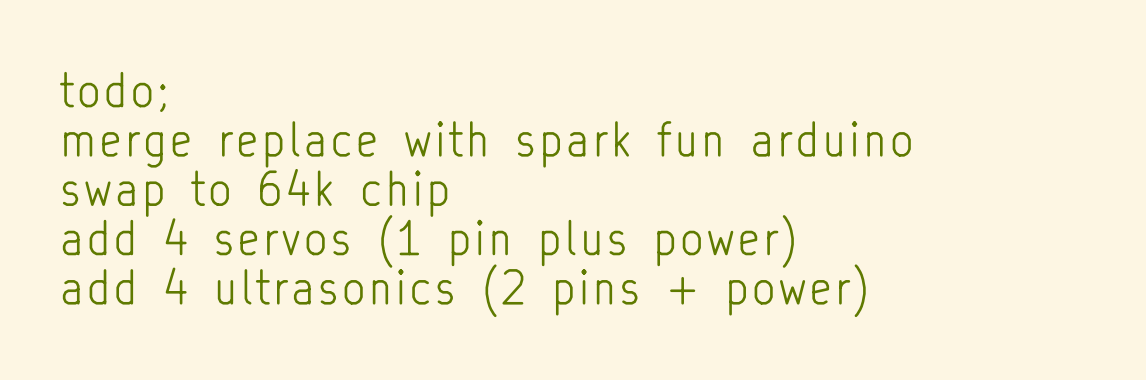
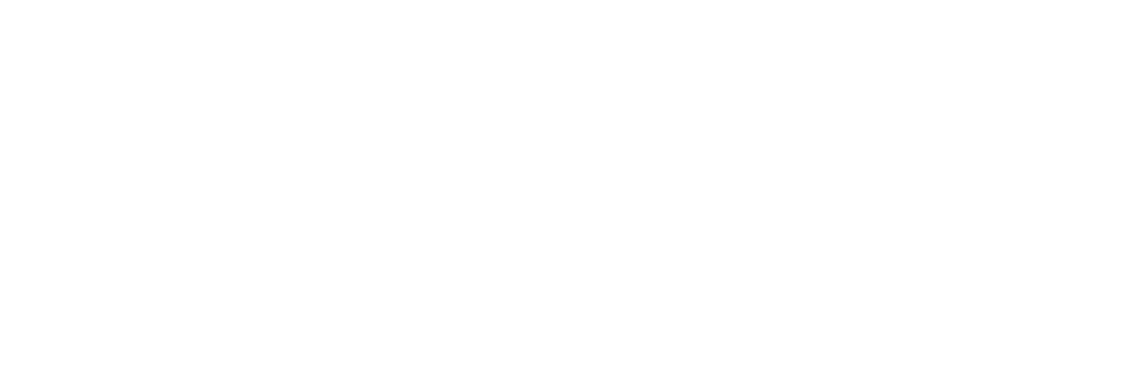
text: todo; (112, 91) -> none
text: merge replace with spark fun arduino (487, 144) -> none
text: swap to 64k chip (255, 192) -> none
text: add 4 servos (1 pin plus power) (428, 241) -> none
text: add 4 ultrasonics (2 pins + power) (464, 290) -> none

